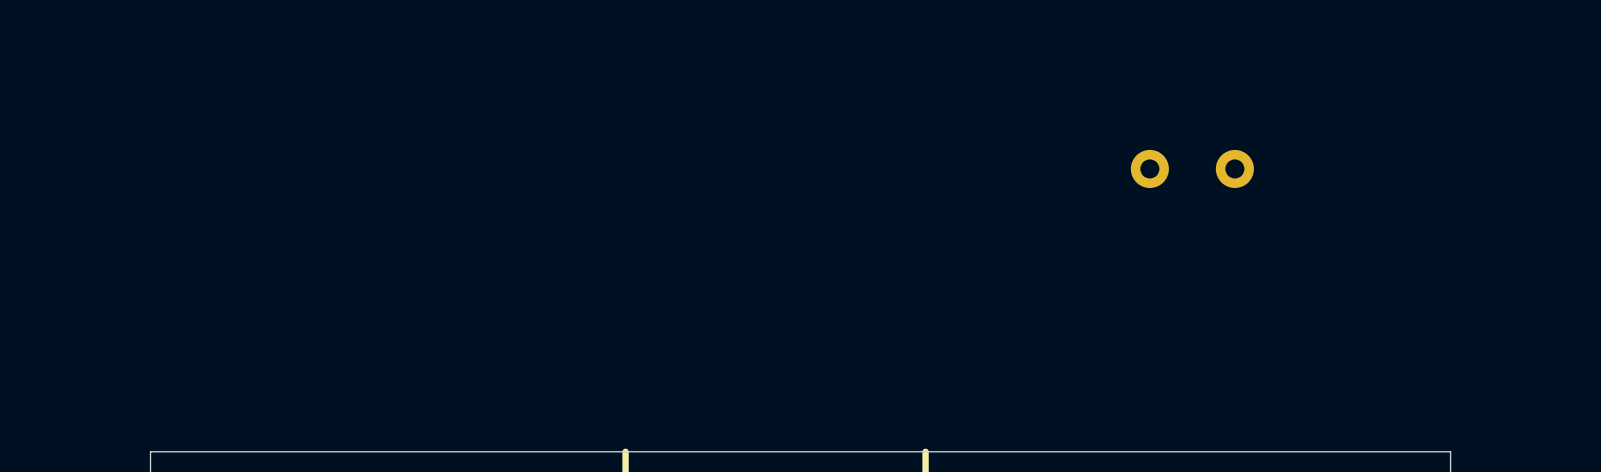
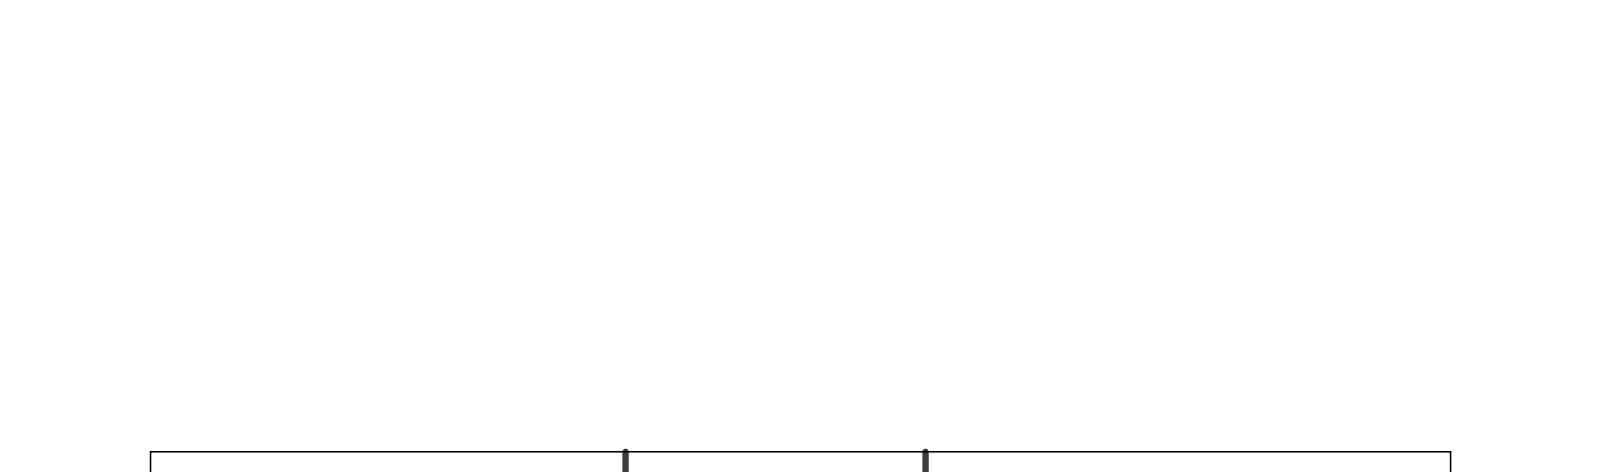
part: (1192, 168) -> none

